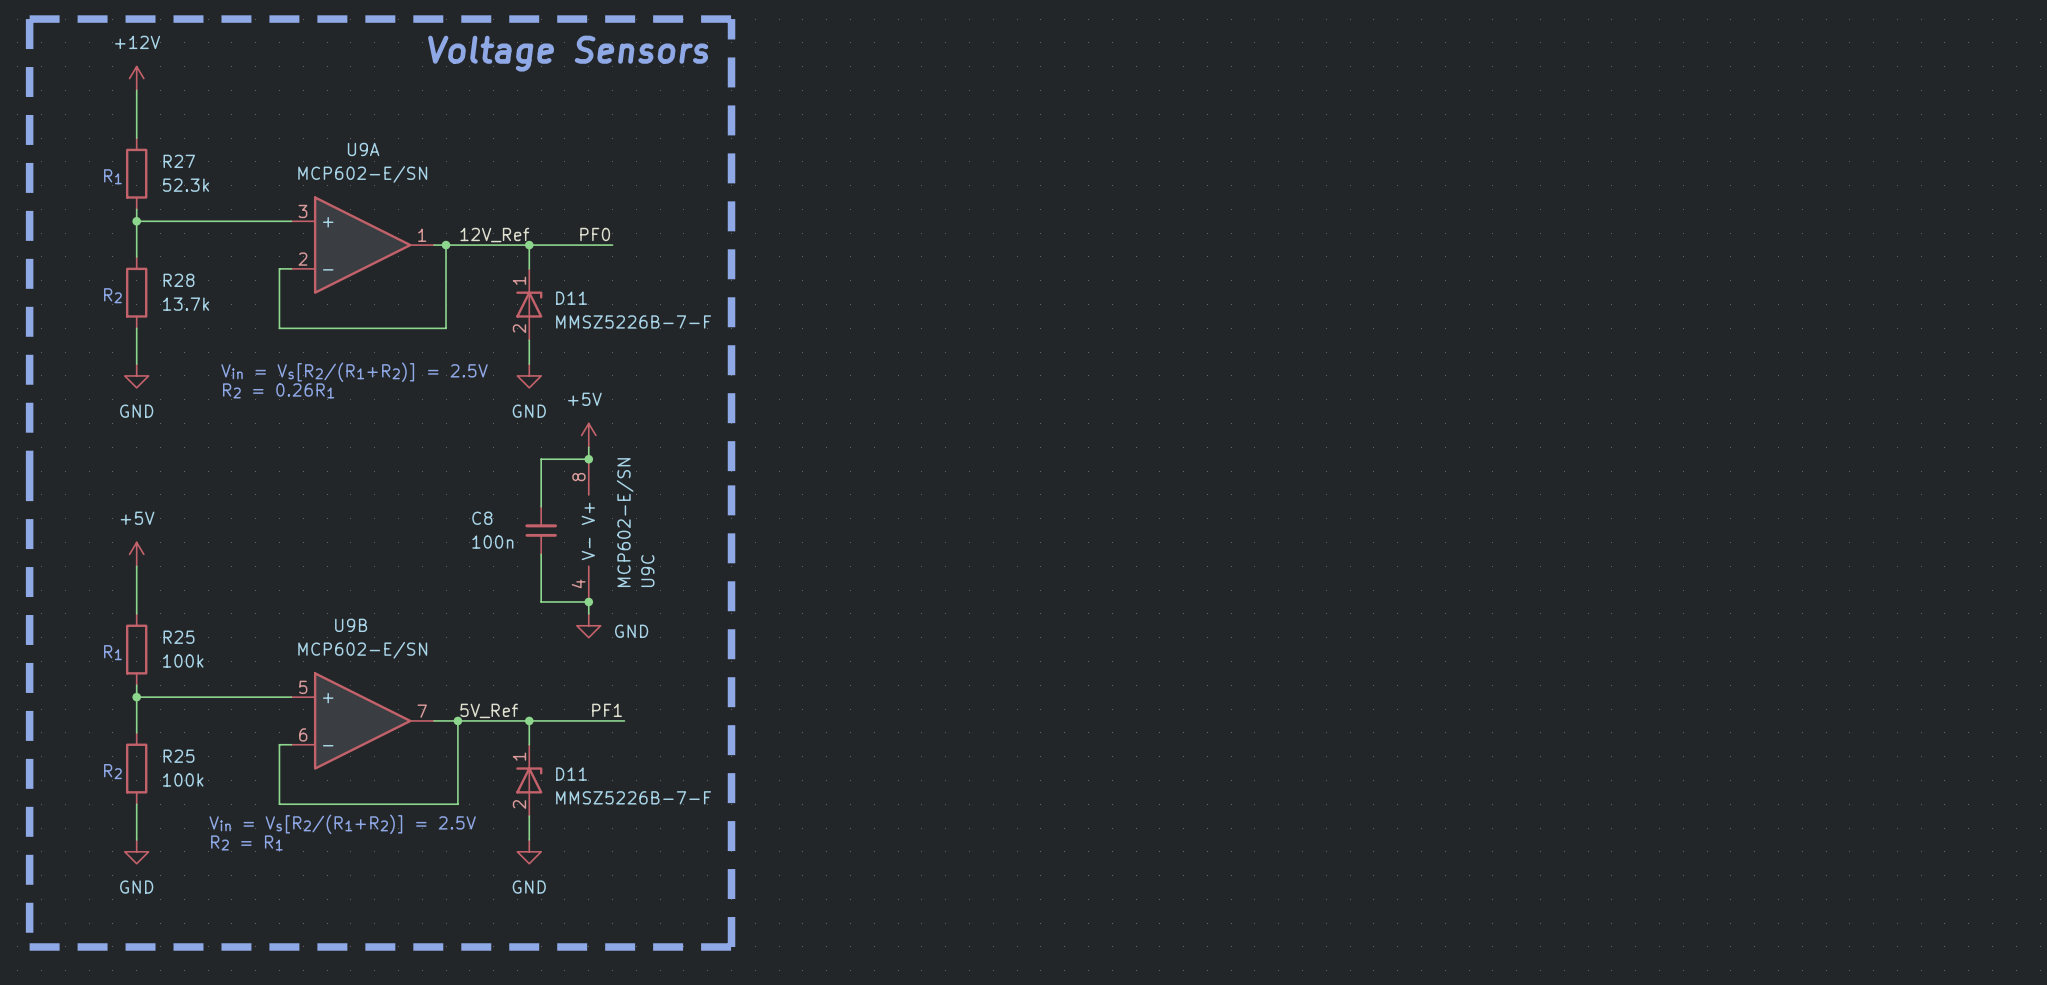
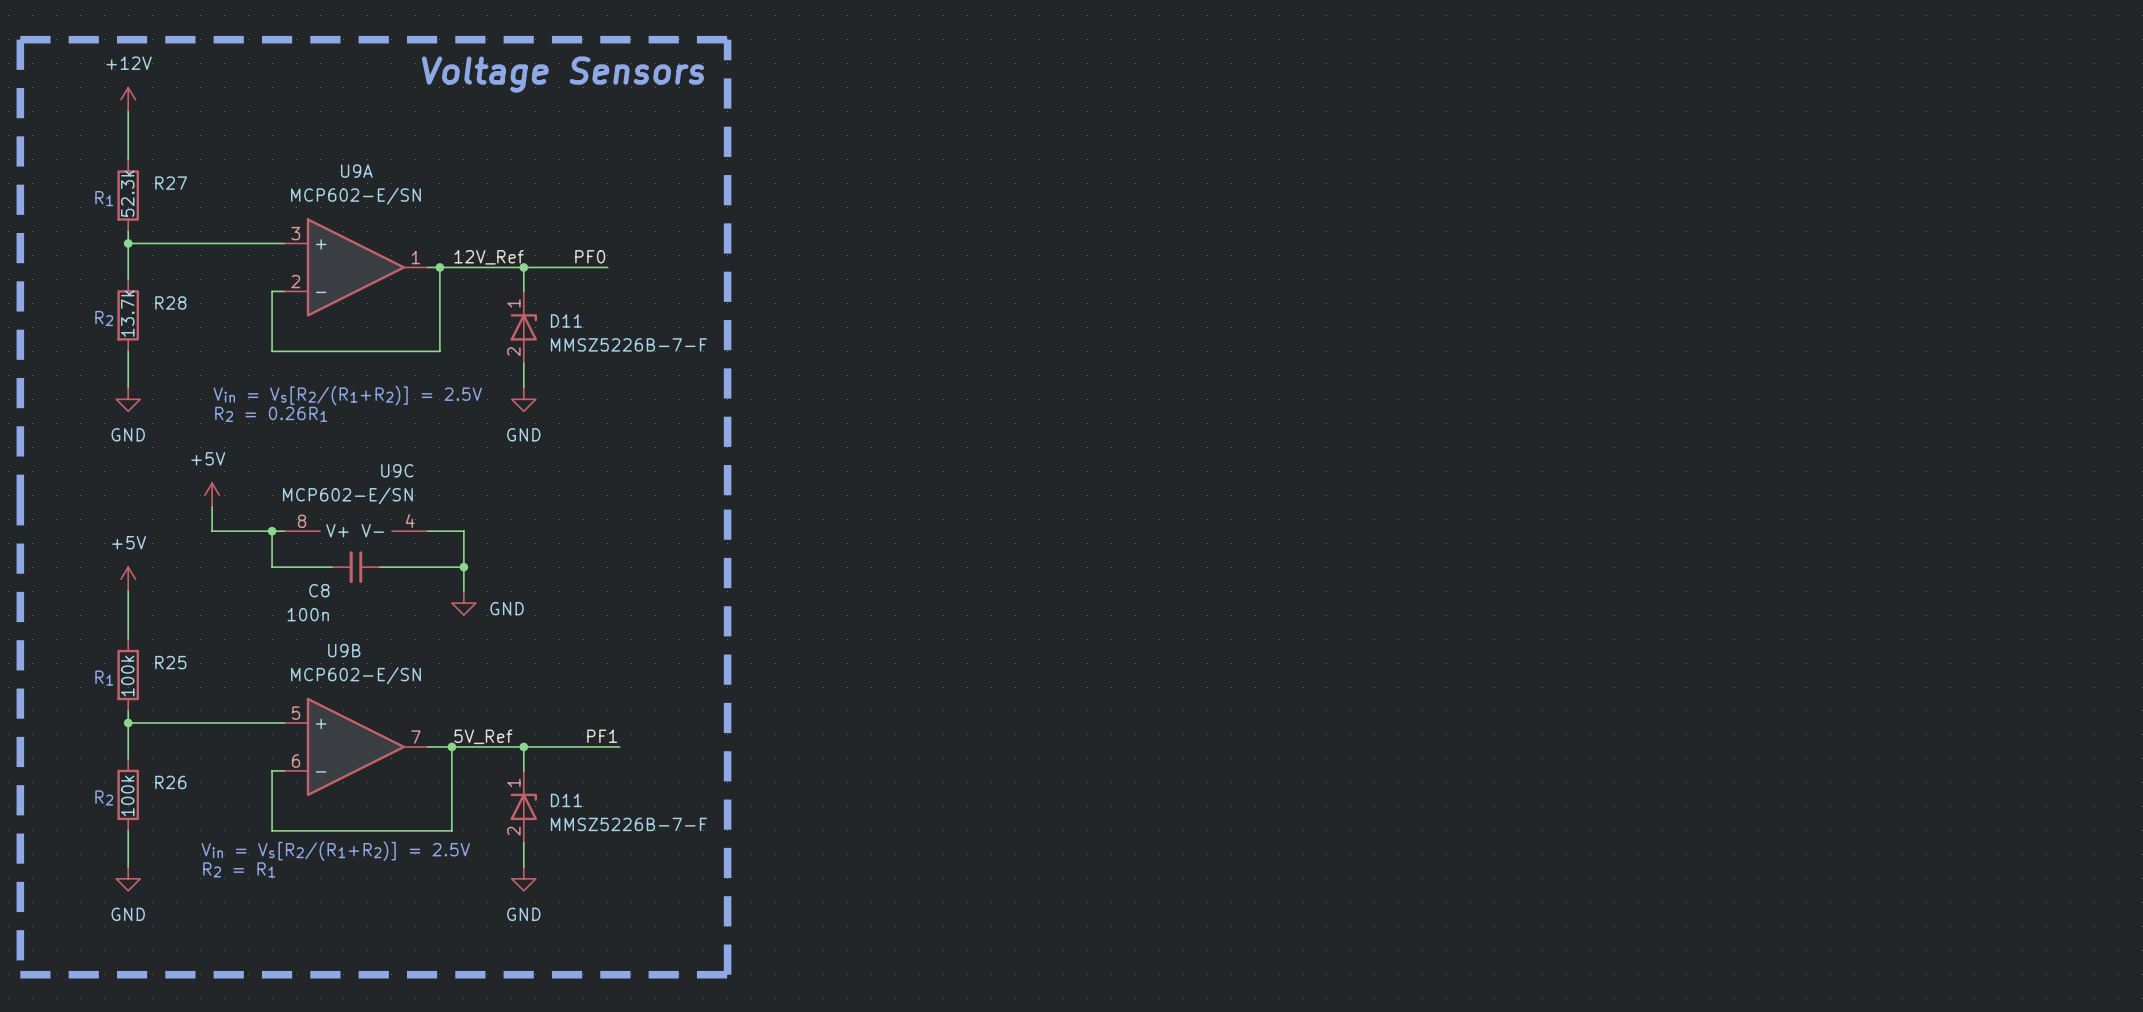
R27 value rotation: 0° (186, 185) -> 90° counterclockwise (127, 193)
R28 value rotation: 0° (186, 304) -> 90° counterclockwise (127, 313)
power symbol: +5V (588, 435) -> none
wire: (588, 447) (588, 459) (541, 459) (541, 506) -> none
junction: (588, 459) -> none
power symbol: none -> +5V (212, 495)
wire: none -> (212, 507) (212, 531) (284, 531)
wire: none -> (272, 531) (272, 567) (332, 567)
junction: none -> (272, 531)
wire: none -> (427, 531) (463, 531) (463, 591)
C8 name position: C8 (482, 518) -> C8 (319, 590)
C8 rotation: 0° (541, 530) -> 90° counterclockwise (355, 567)
C8 position: (541, 530) -> (355, 567)
U9C rotation: 0° (588, 530) -> 90° counterclockwise (355, 531)
U9C position: (588, 530) -> (355, 531)
wire: none -> (379, 567) (463, 567)
junction: none -> (463, 567)
C8 value position: 100n (492, 542) -> 100n (308, 614)
wire: (541, 554) (541, 601) (588, 601) (588, 613) -> none
junction: (588, 601) -> none
power symbol position: GND (588, 625) -> GND (463, 603)
R25 value rotation: 0° (183, 661) -> 90° counterclockwise (127, 676)
R25 name: R25 (178, 756) -> R26 (170, 782)
R25 value rotation: 0° (183, 779) -> 90° counterclockwise (127, 795)

